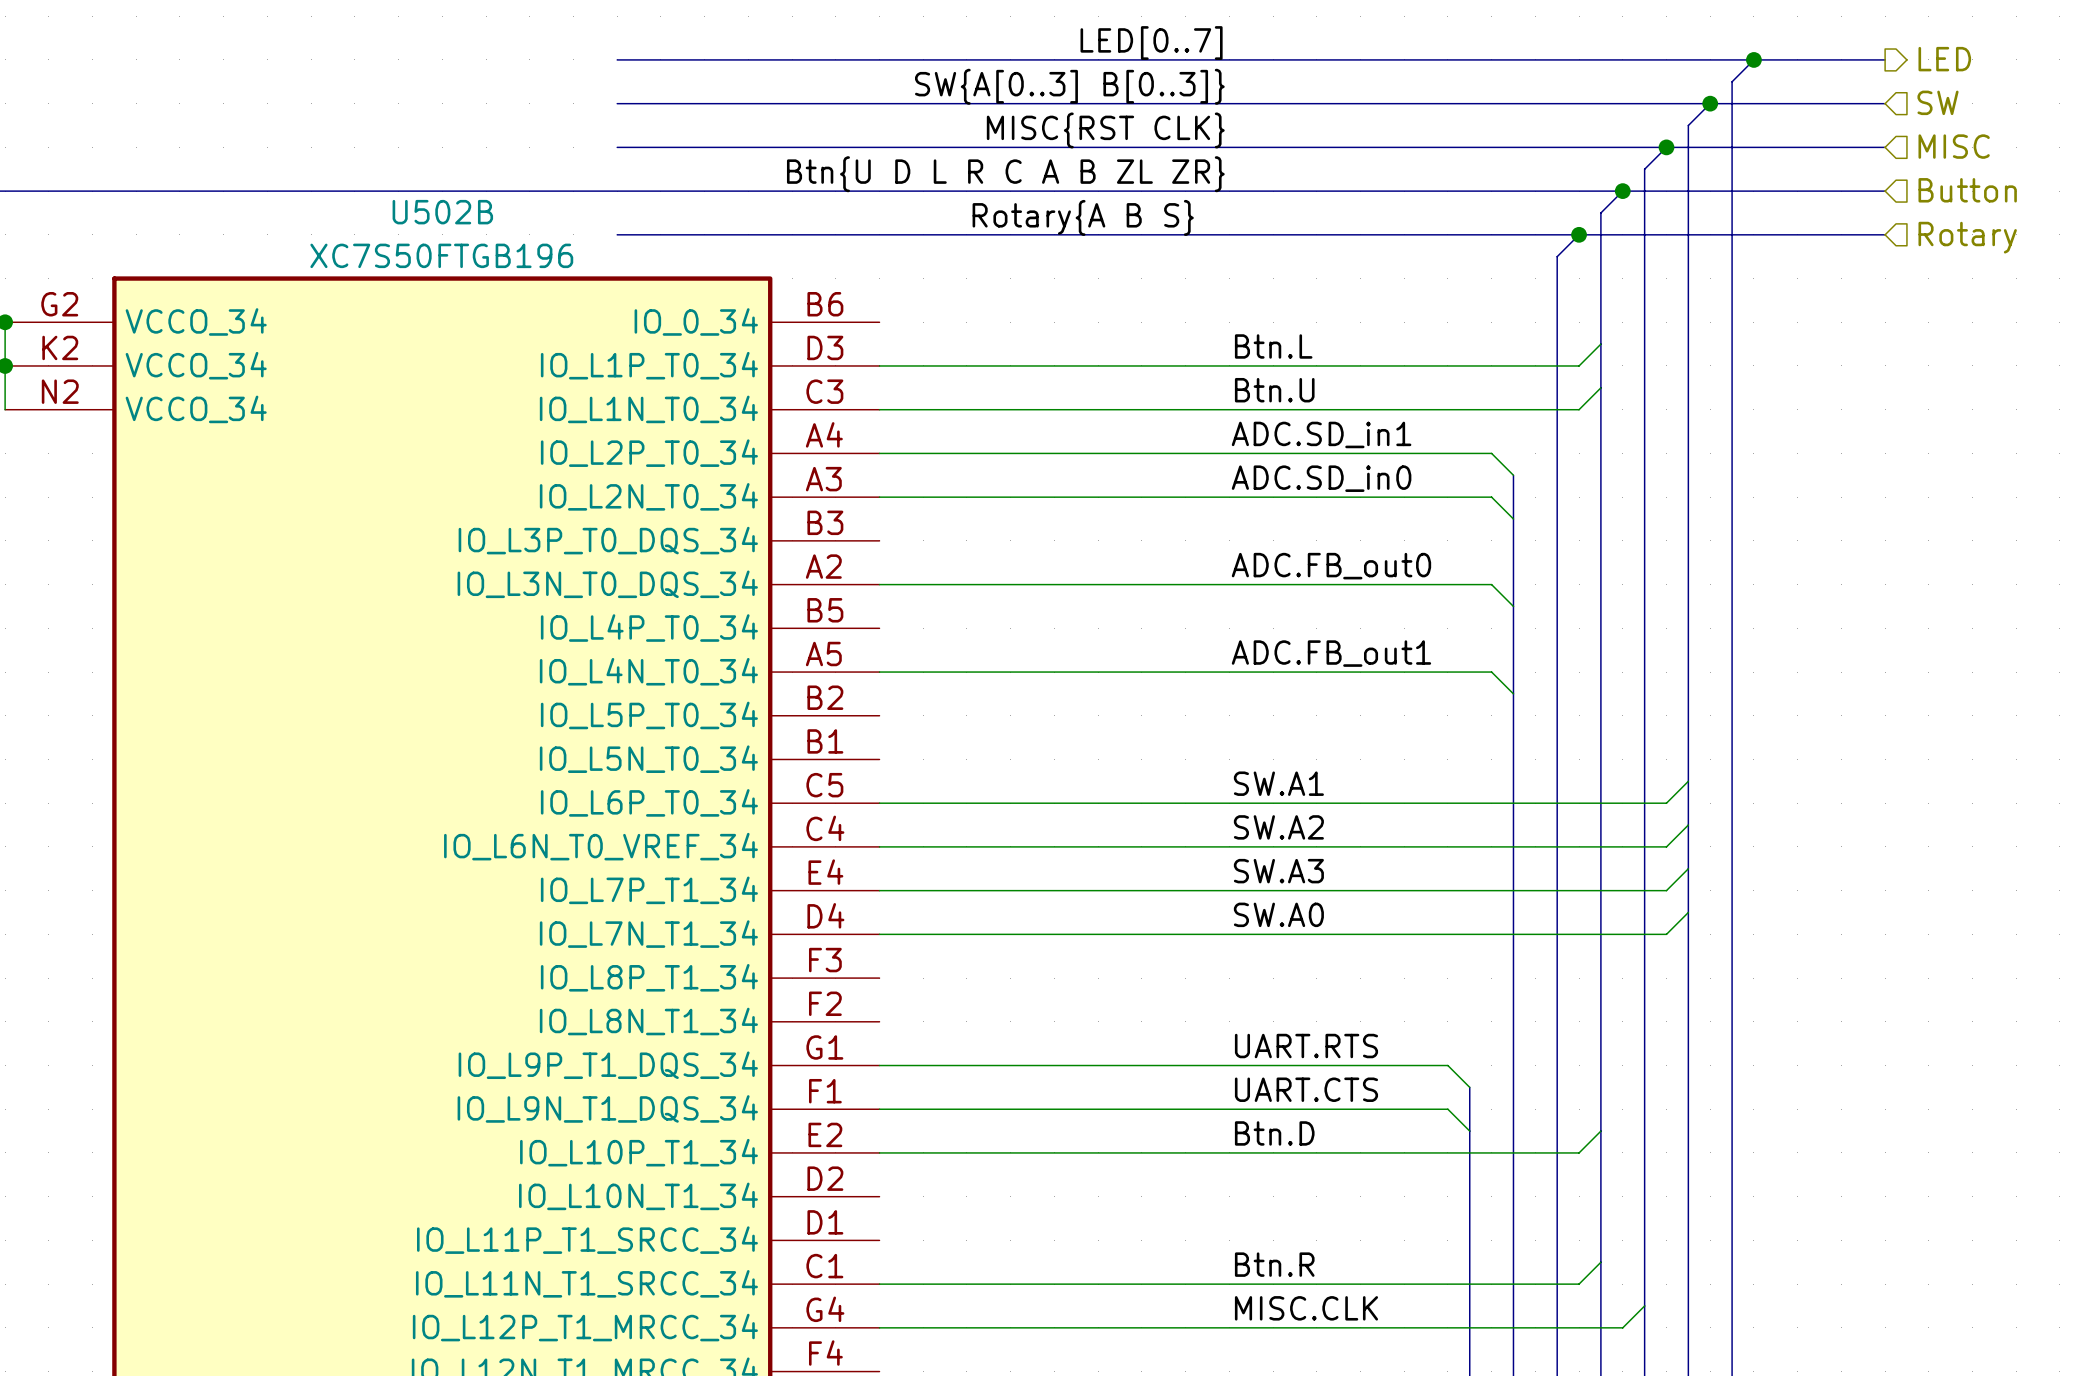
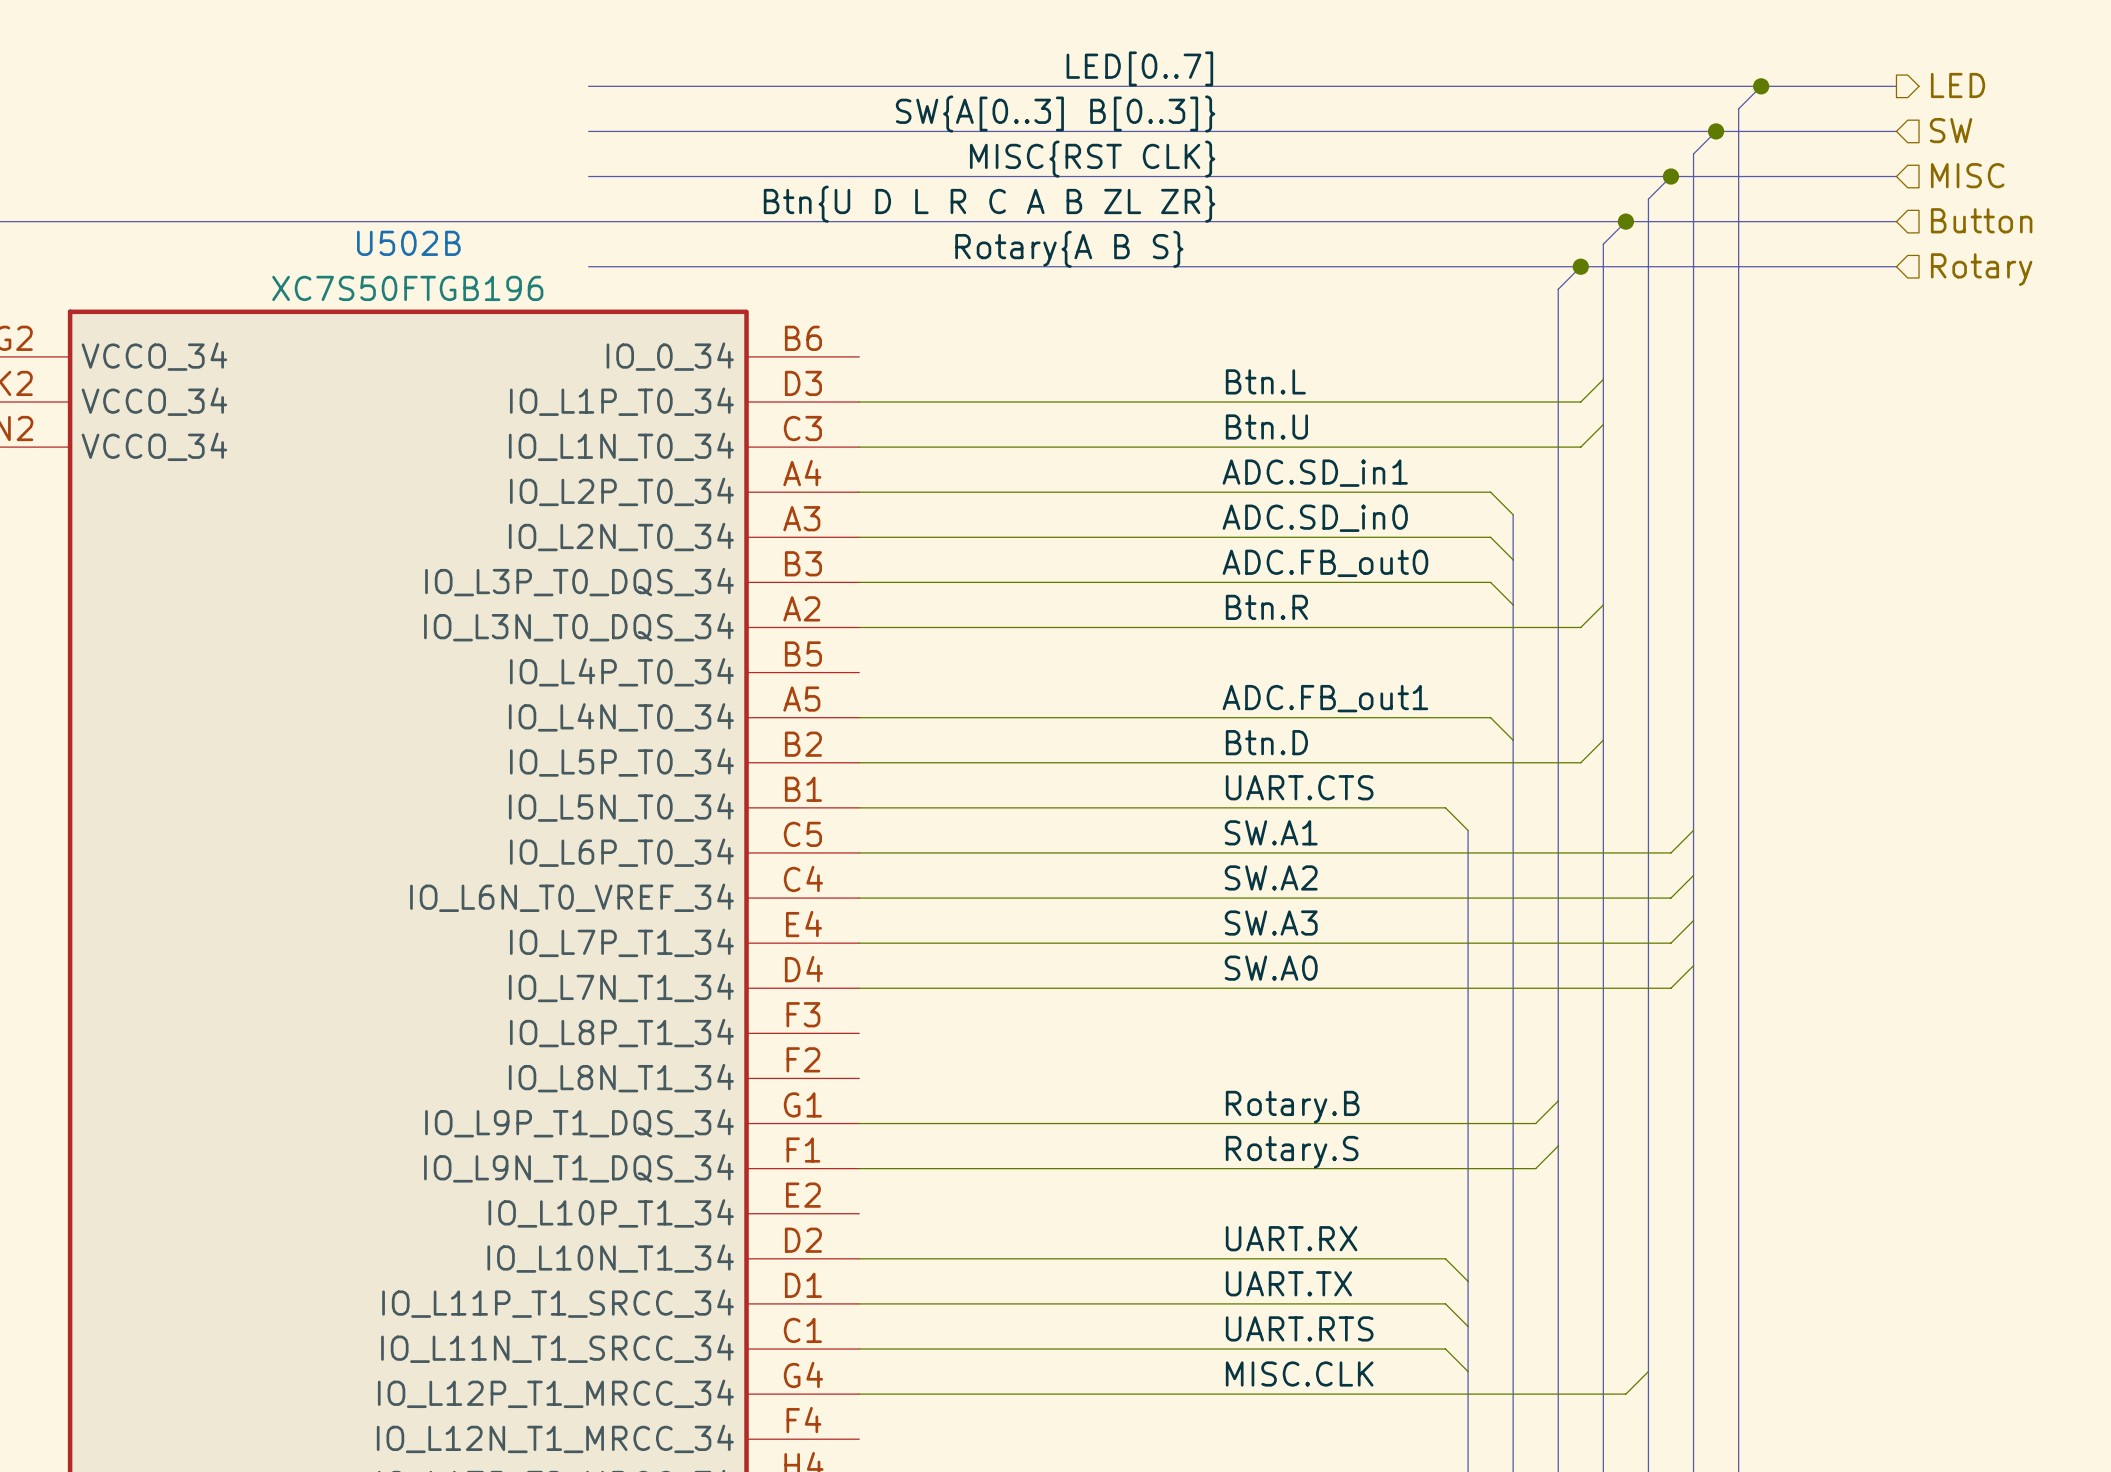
label: none -> ADC.FB_out0 (1325, 563)
wire: none -> (859, 582) (1490, 582) (1513, 604)
label: ADC.FB_out0 (1331, 566) -> Btn.R (1266, 607)
wire: (1491, 584) (1513, 606) -> (1490, 627) (1580, 627) (1603, 604)
wire: none -> (1603, 740) (1580, 762) (859, 762)
label: none -> Btn.D (1266, 742)
label: none -> UART.CTS (1299, 787)
wire: none -> (859, 807) (1445, 807) (1468, 830)
bus: none -> (1468, 830) (1468, 1146)
label: UART.RTS (1306, 1046) -> Rotary.B (1292, 1107)
wire: (1447, 1065) (1469, 1087) -> (1445, 1123) (1535, 1123) (1558, 1100)
label: UART.CTS (1306, 1089) -> Rotary.S (1292, 1152)
wire: (1447, 1109) (1469, 1131) -> (1445, 1168) (1535, 1168) (1558, 1146)
wire: (1600, 1131) (1579, 1152) (879, 1152) -> none
label: Btn.D (1274, 1133) -> none
label: none -> UART.RX (1291, 1238)
wire: none -> (859, 1258) (1445, 1258) (1468, 1281)
label: none -> UART.TX (1288, 1283)
wire: none -> (859, 1303) (1445, 1303) (1468, 1326)
wire: (1600, 1262) (1579, 1284) (1447, 1284) -> (1468, 1371) (1445, 1349)
label: Btn.R (1274, 1264) -> UART.RTS (1299, 1328)

